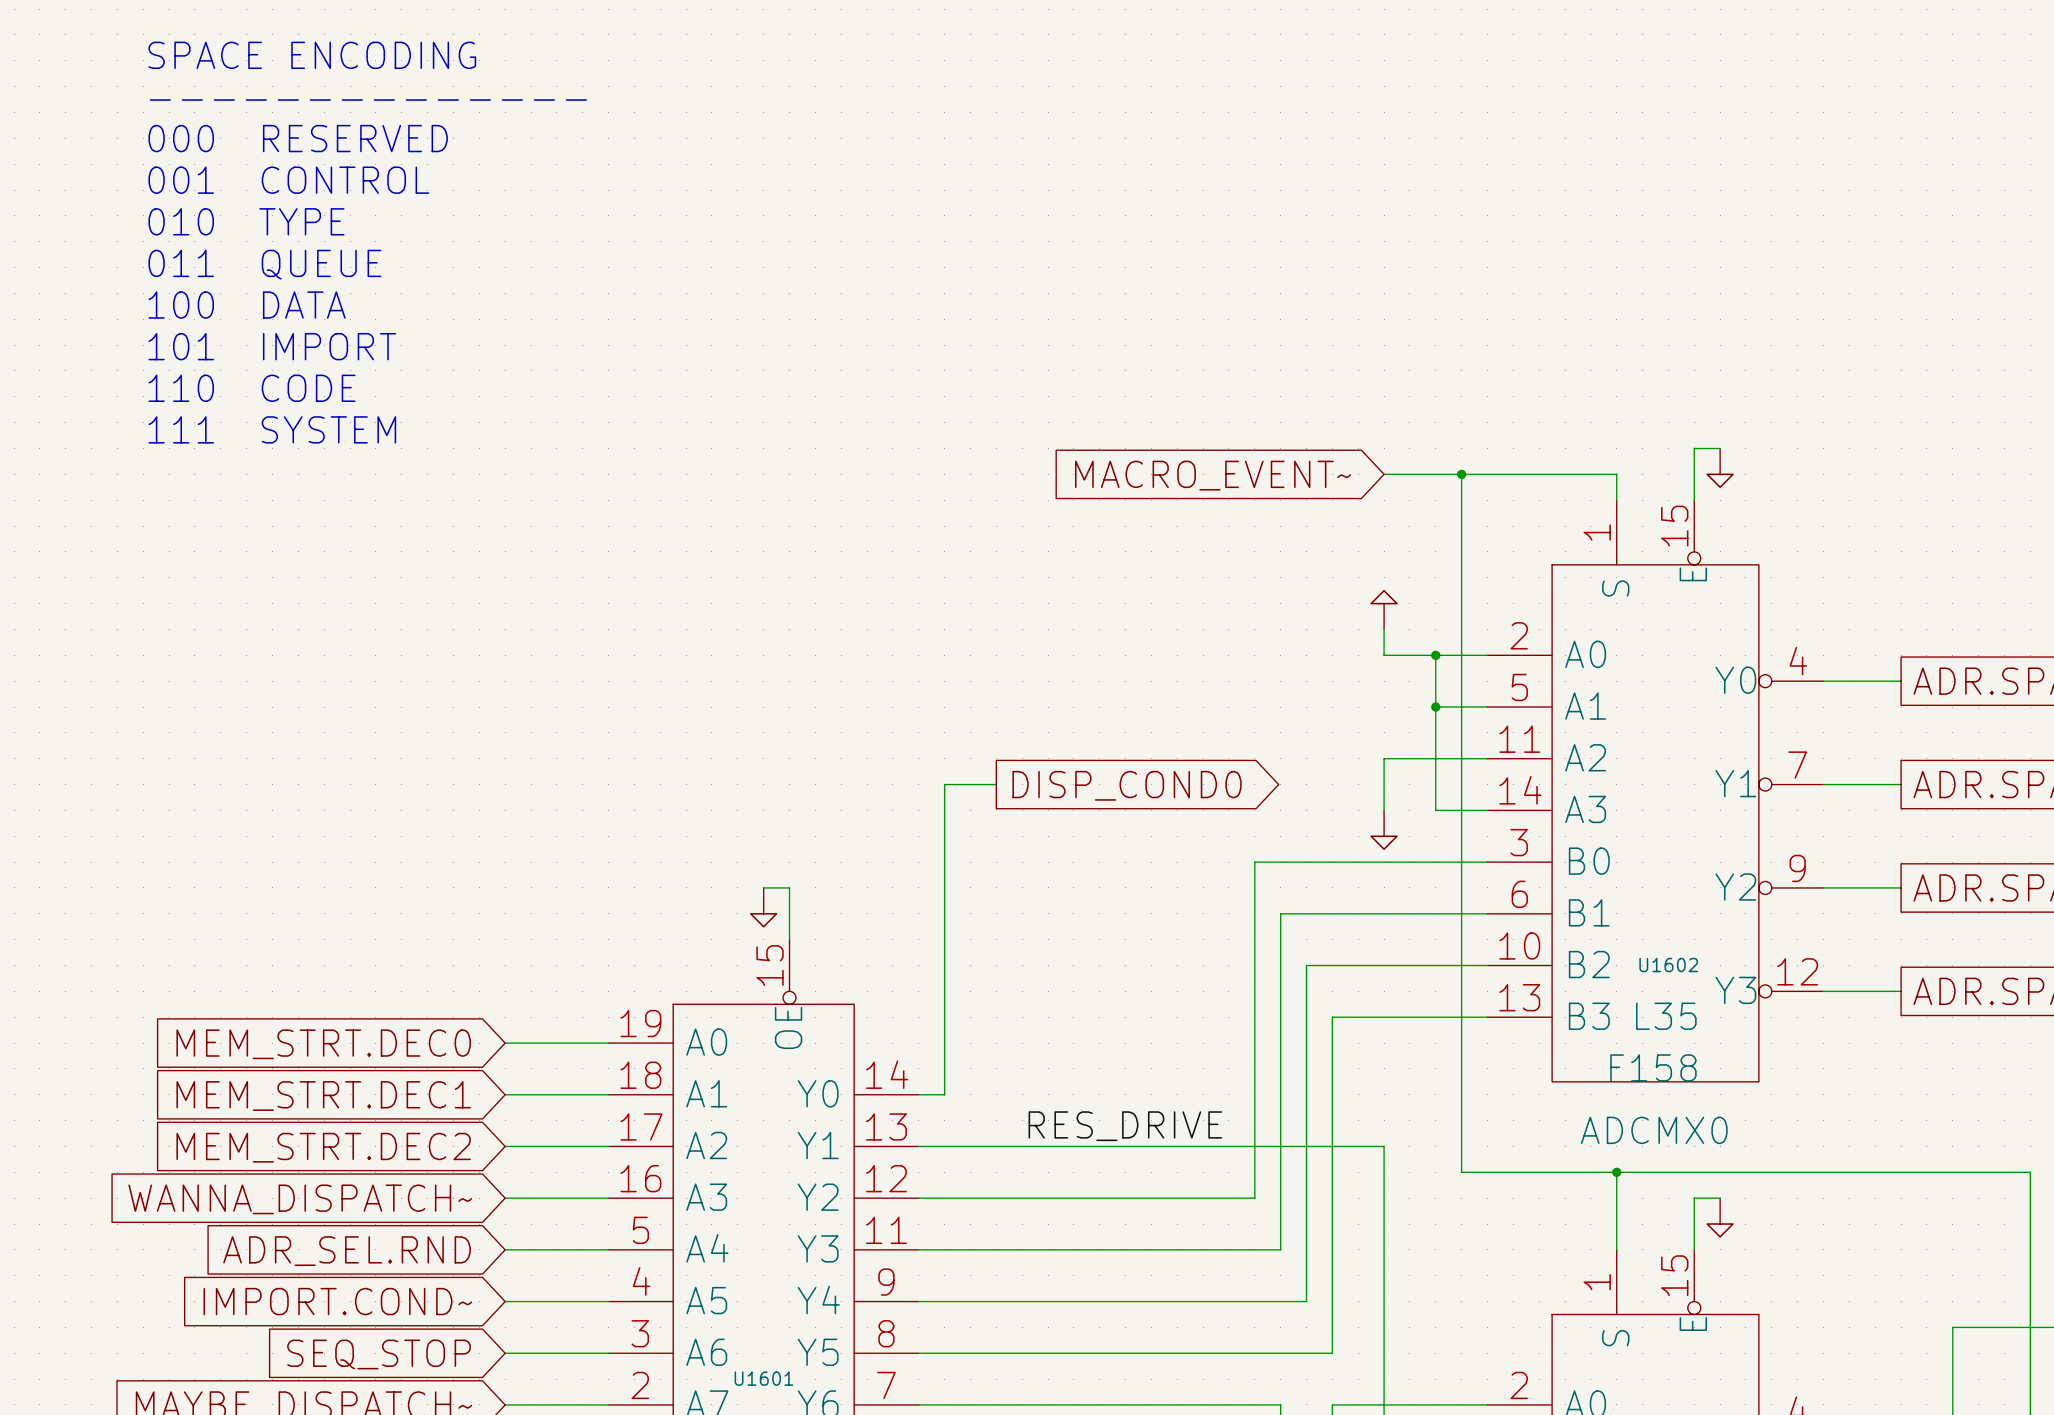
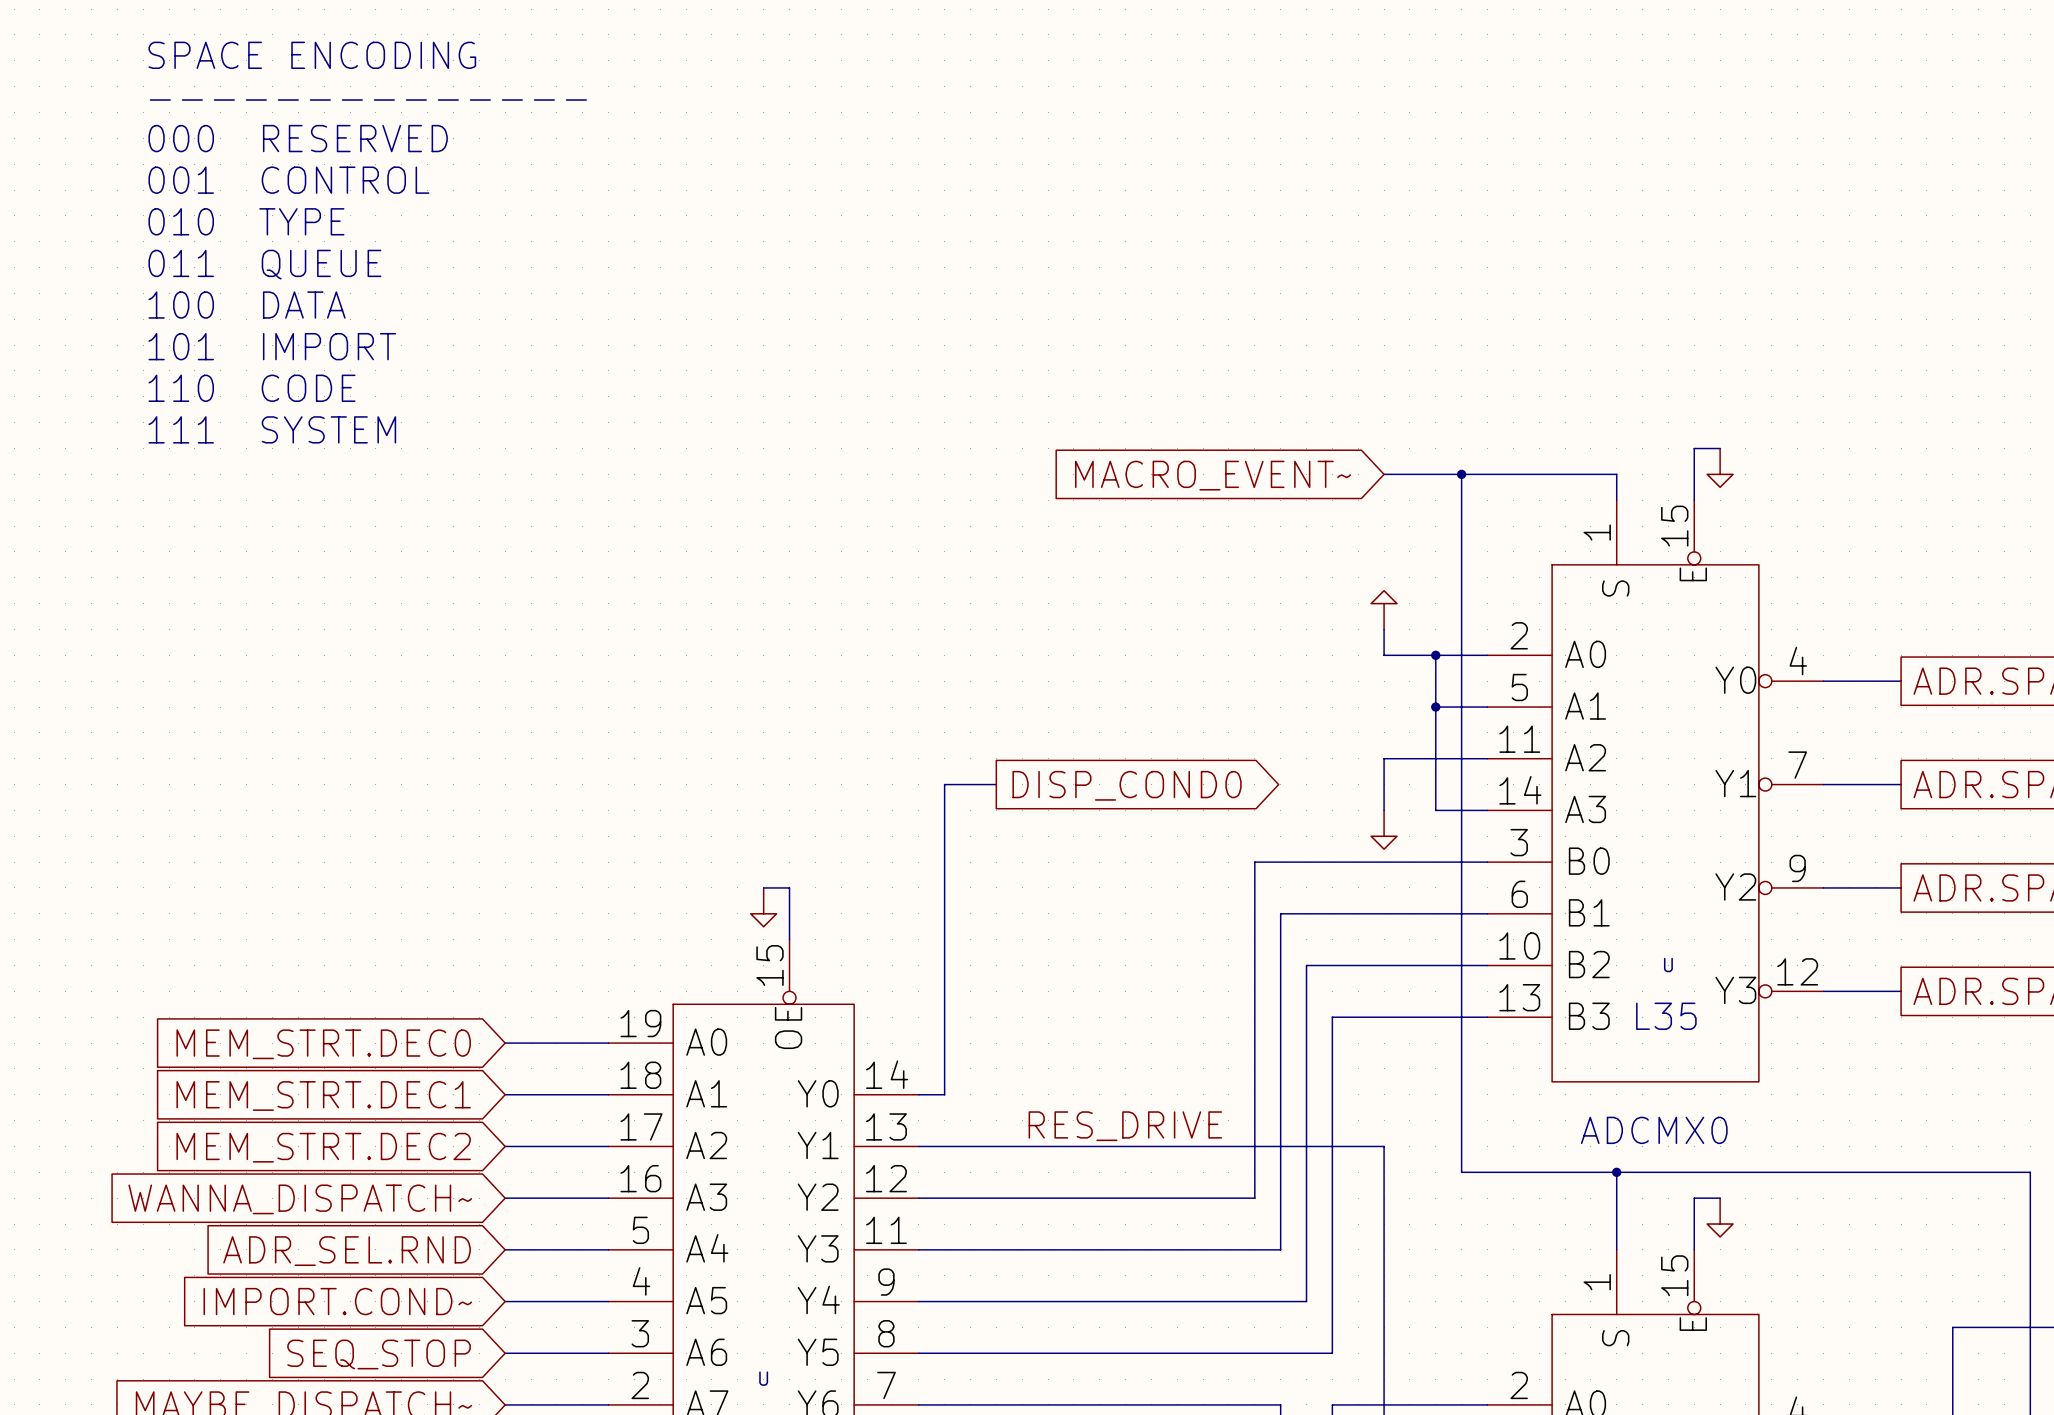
U1602 name: U1602 (1668, 965) -> U (1668, 965)
U1602 value: F158 (1653, 1067) -> none
U1601 name: U1601 (763, 1378) -> U (763, 1378)

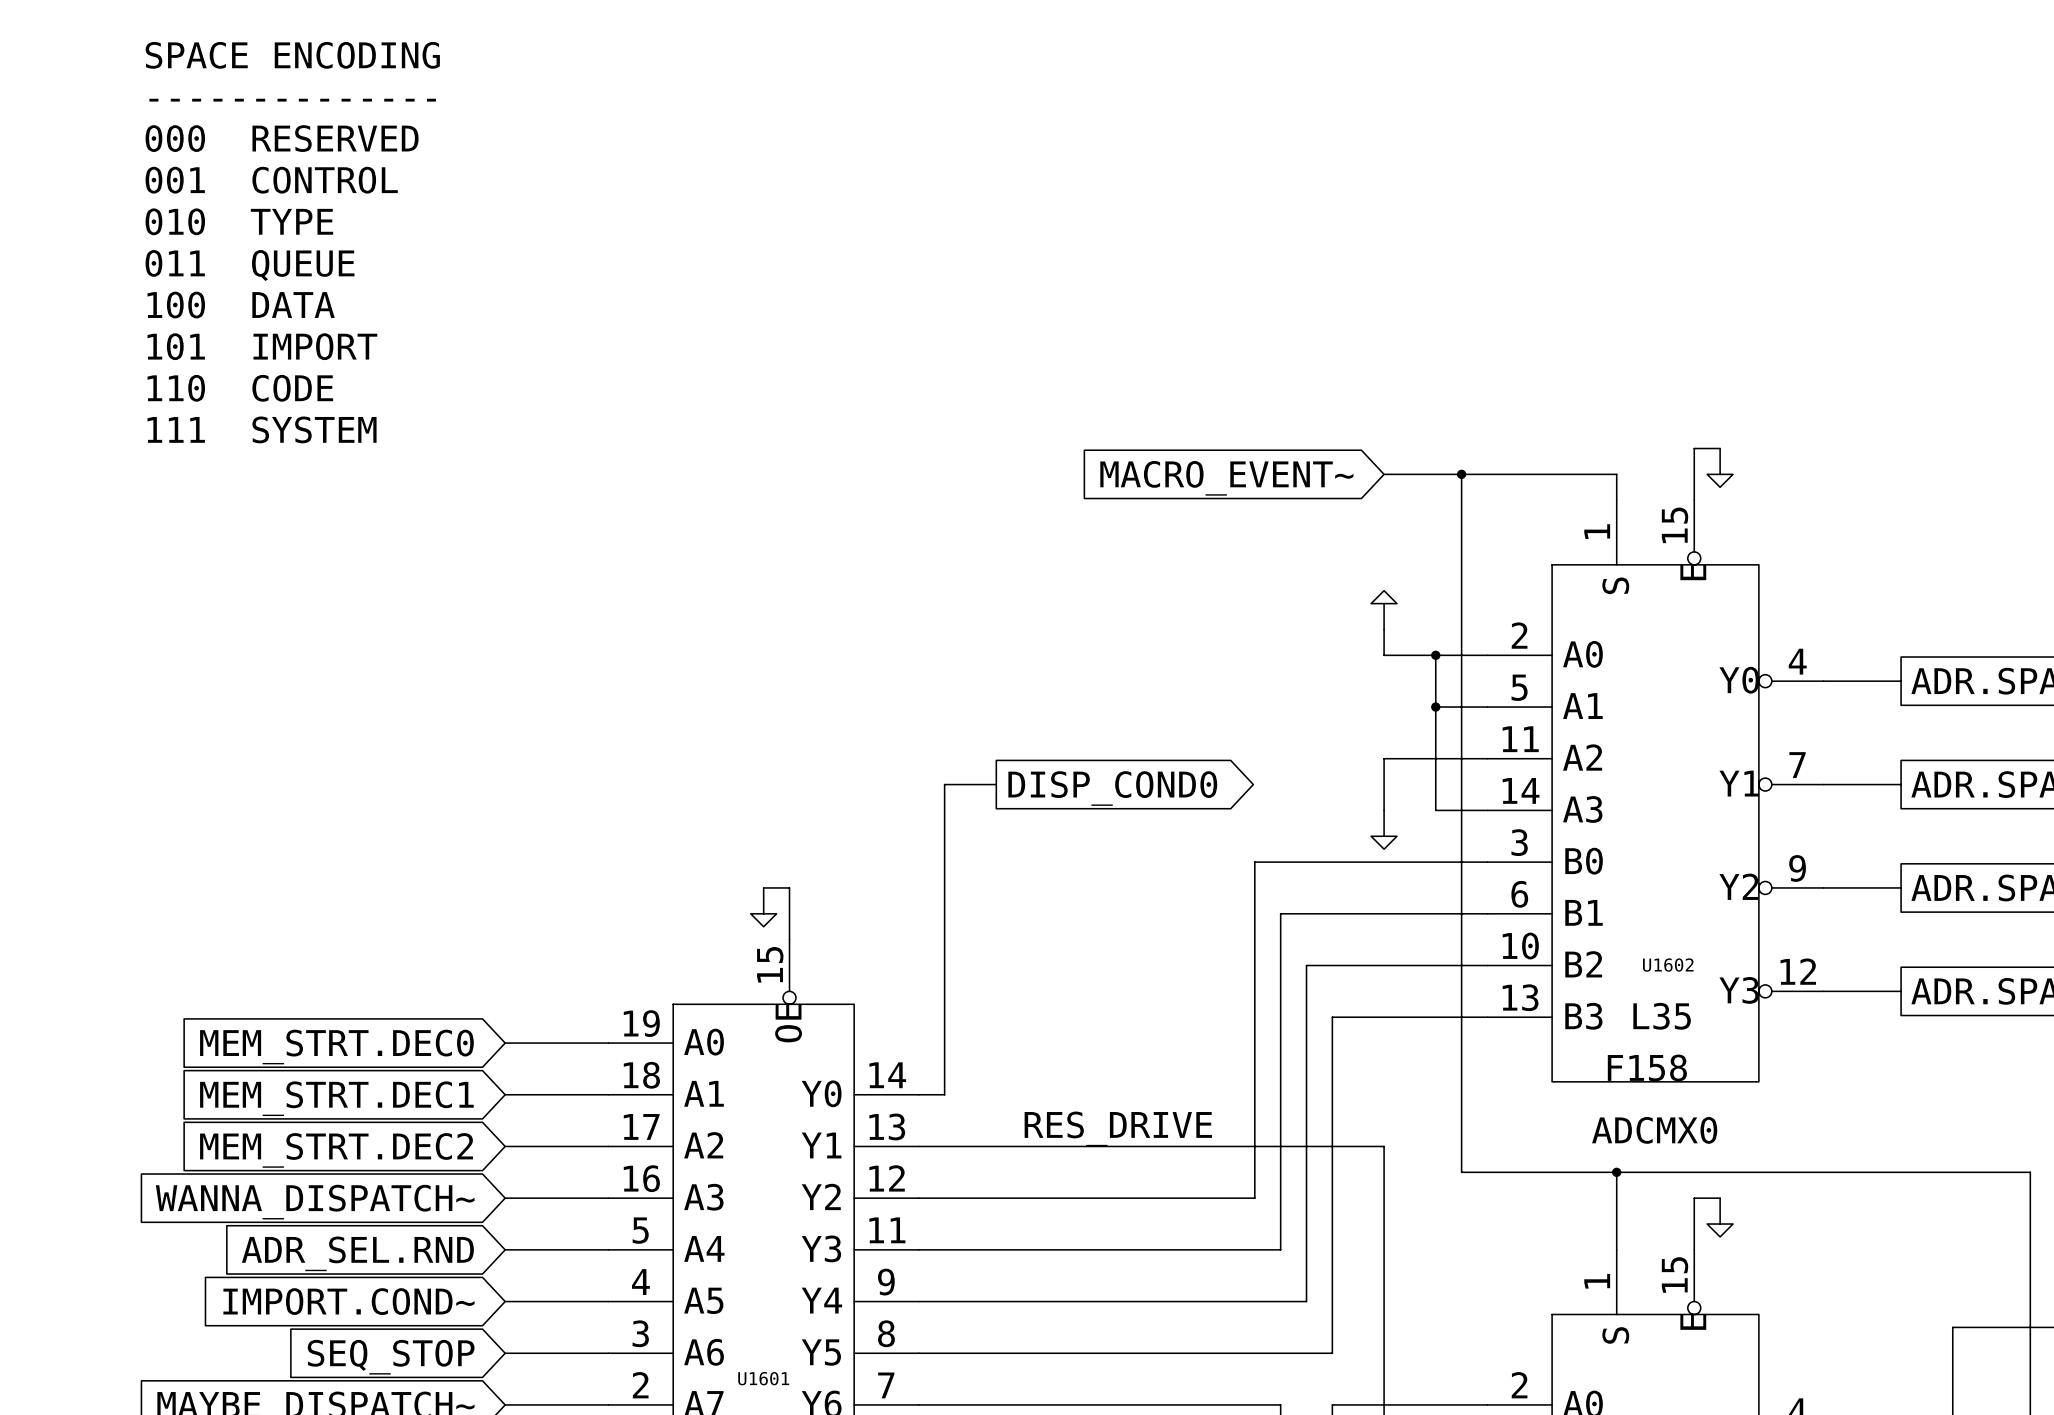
U name: U (1668, 965) -> U1602 (1668, 965)
U value: none -> F158 (1647, 1067)
U name: U (763, 1378) -> U1601 (763, 1378)

